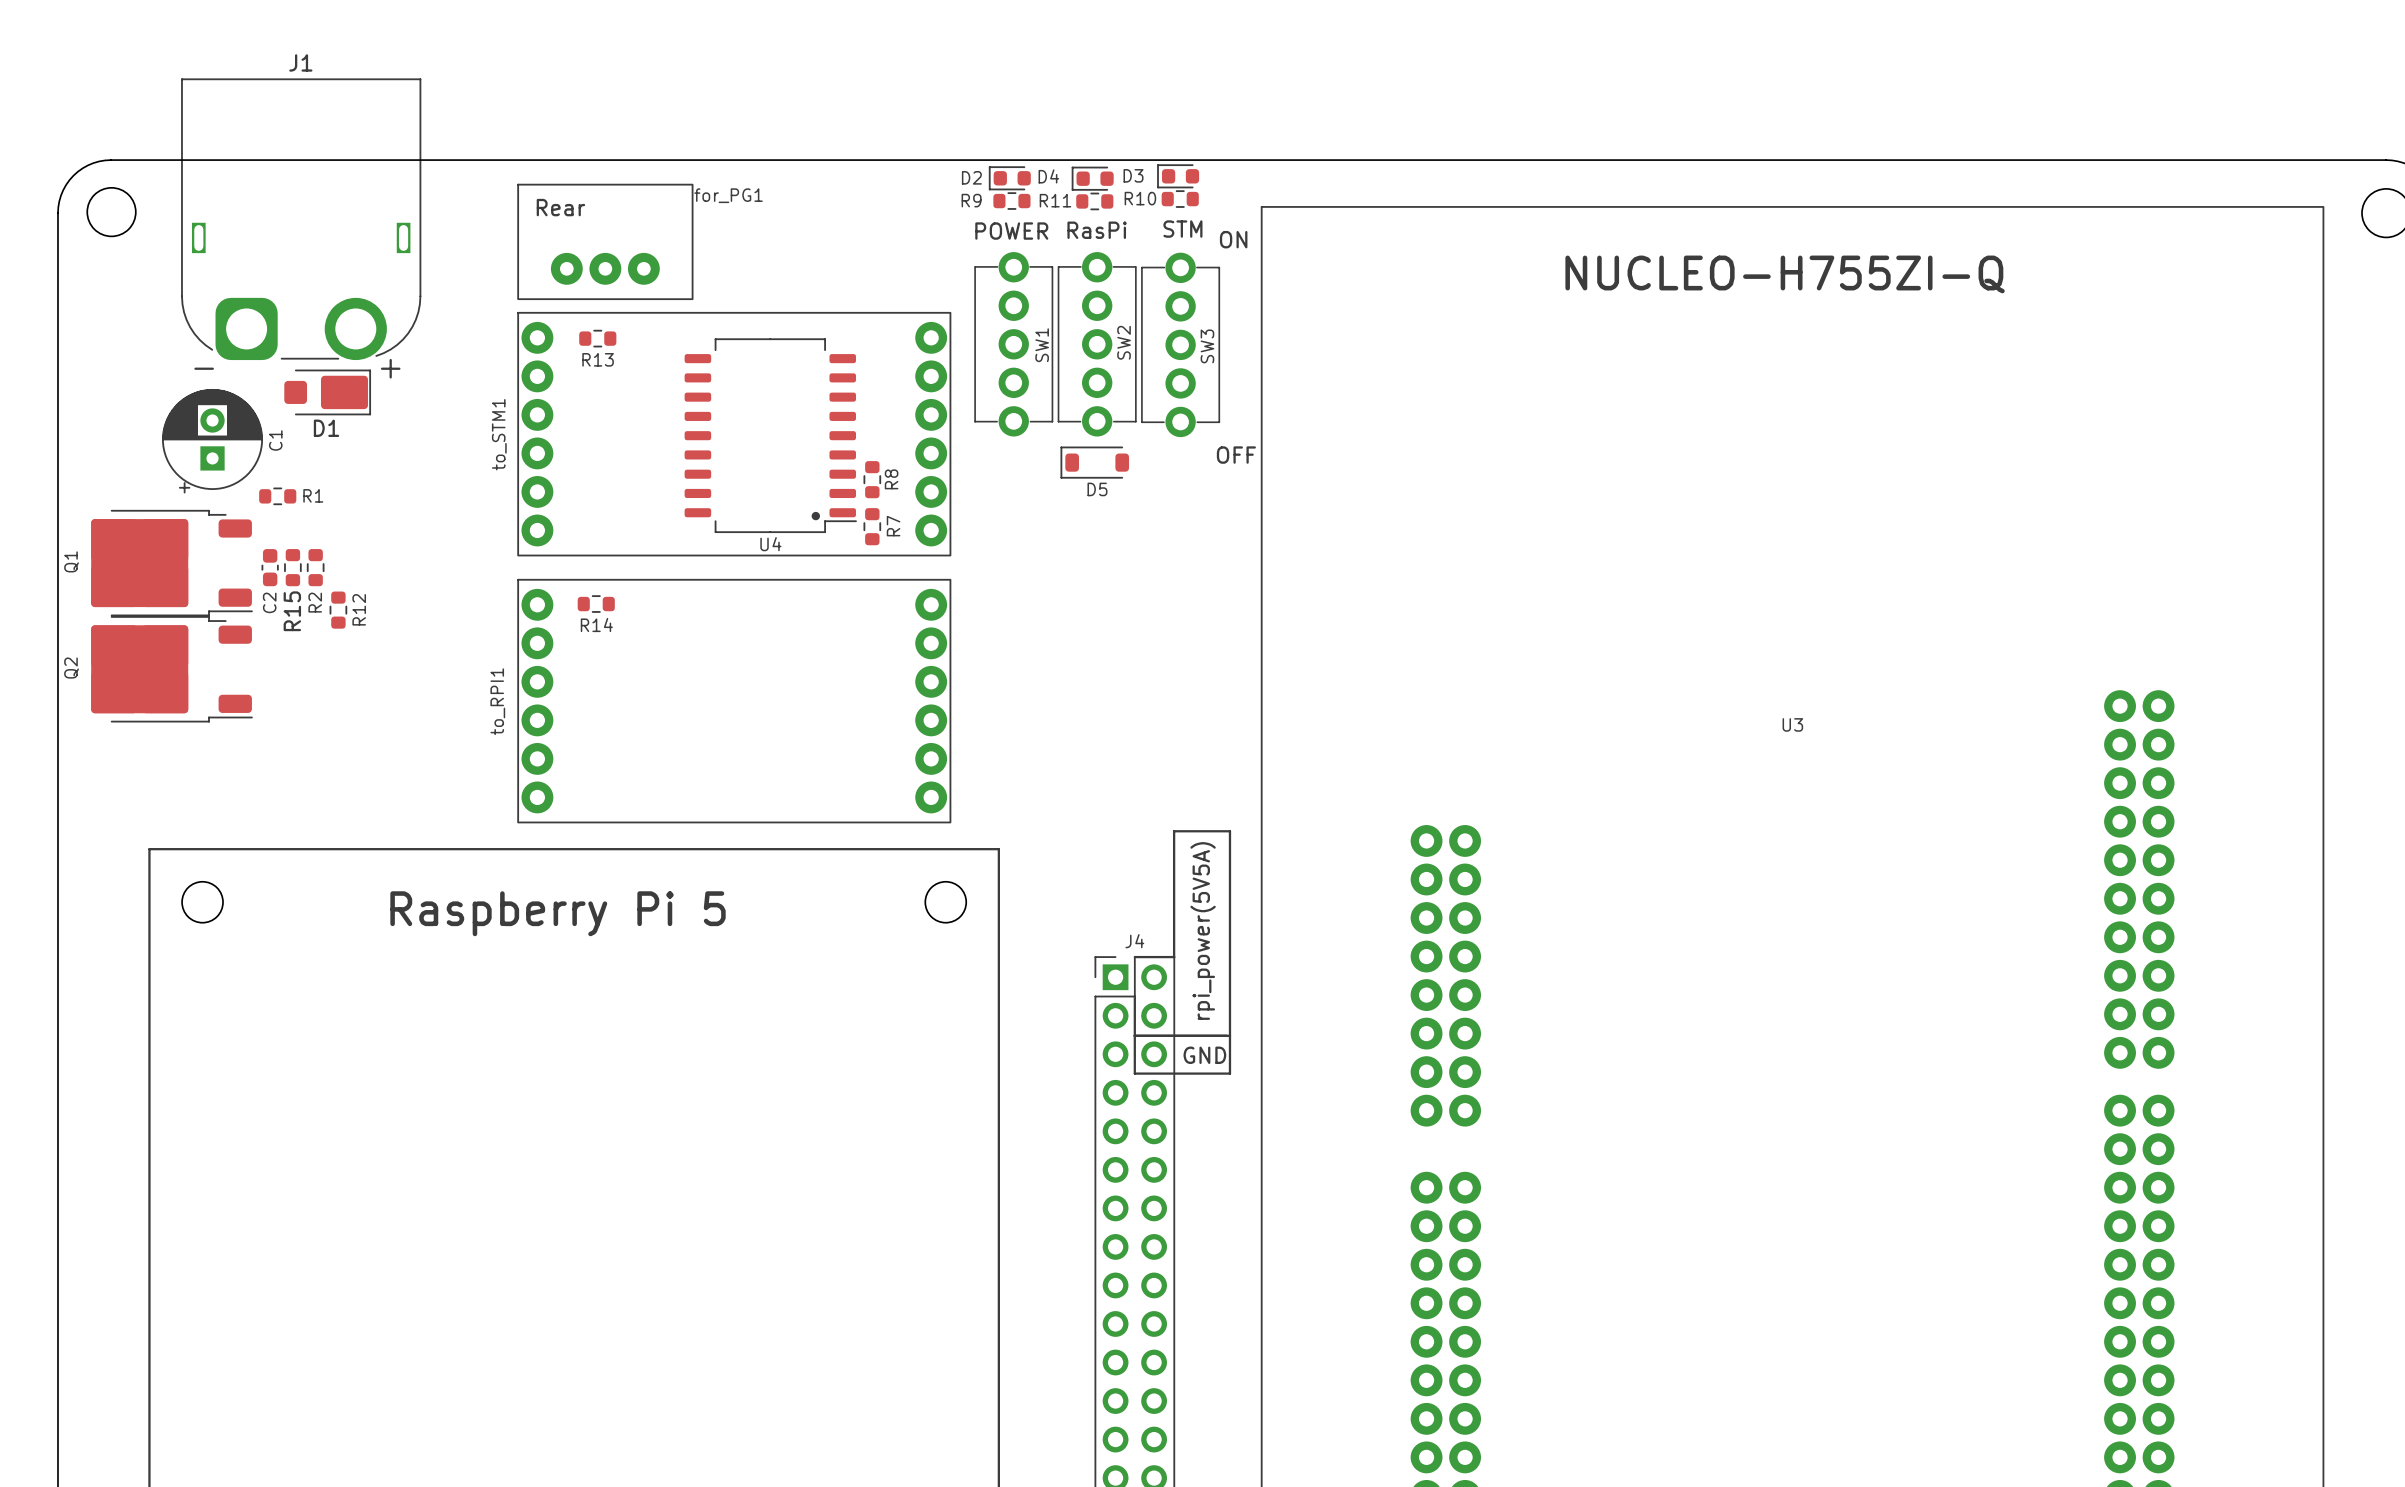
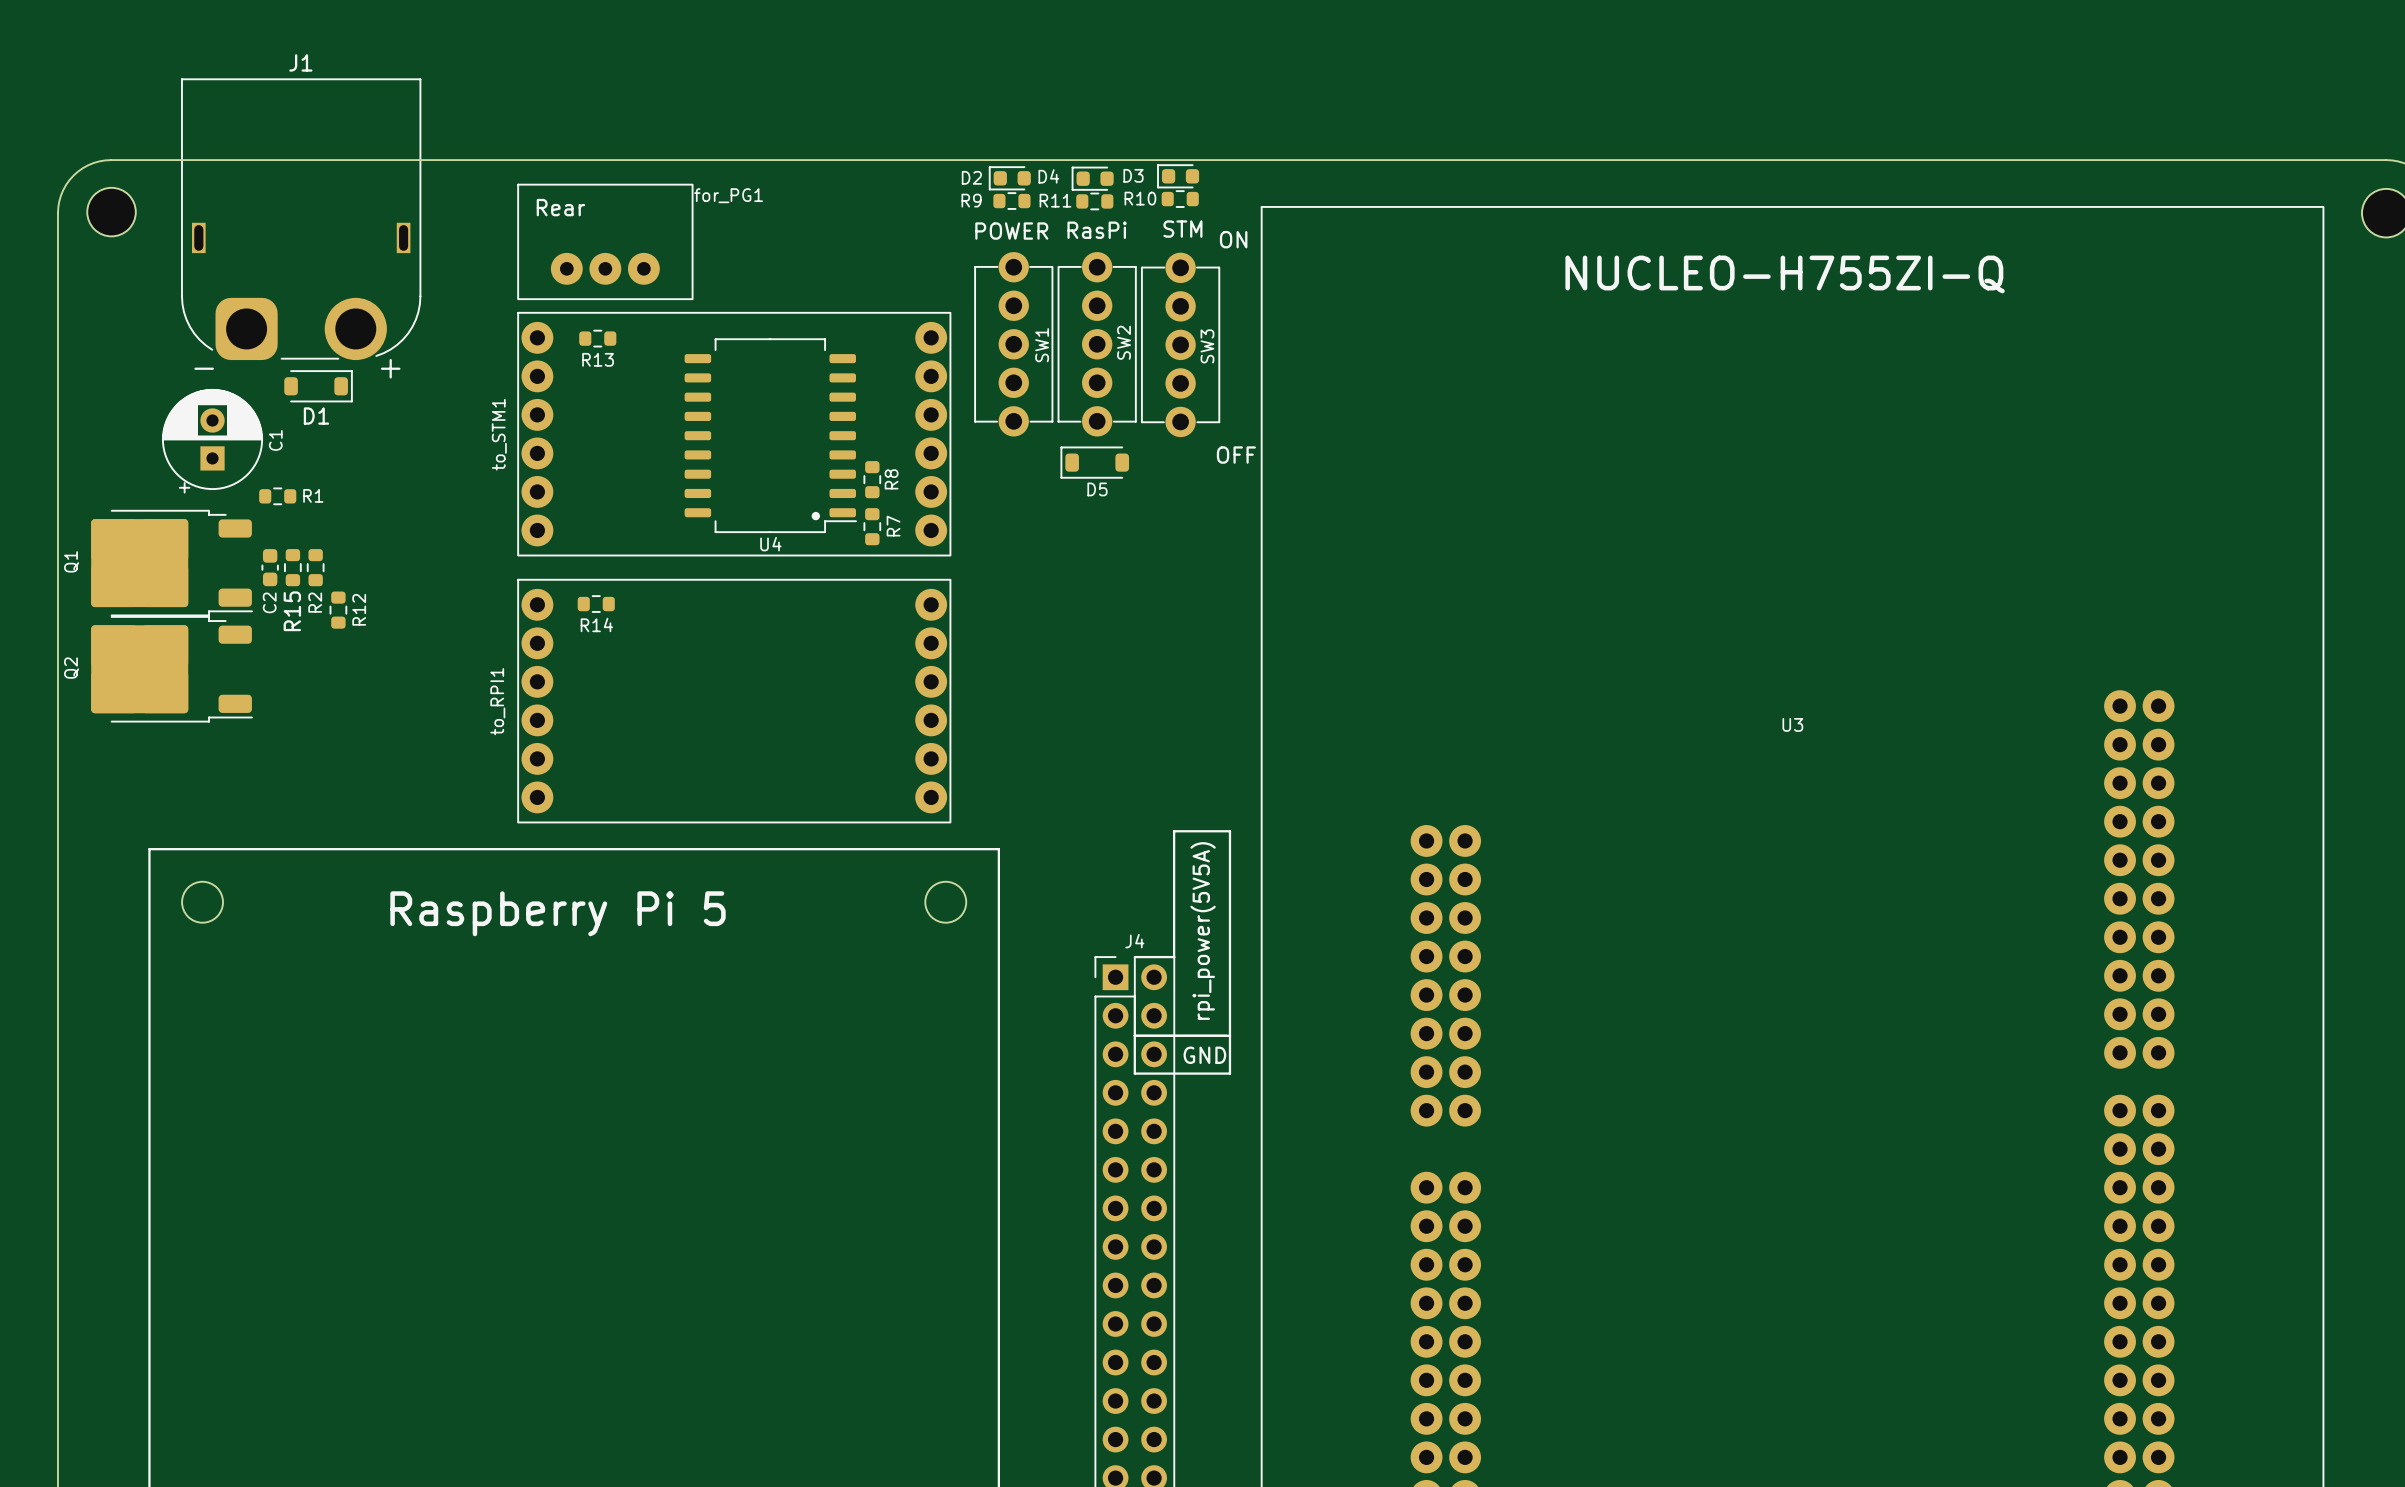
D1 footprint: [284, 369, 372, 416] -> [284, 370, 353, 403]

